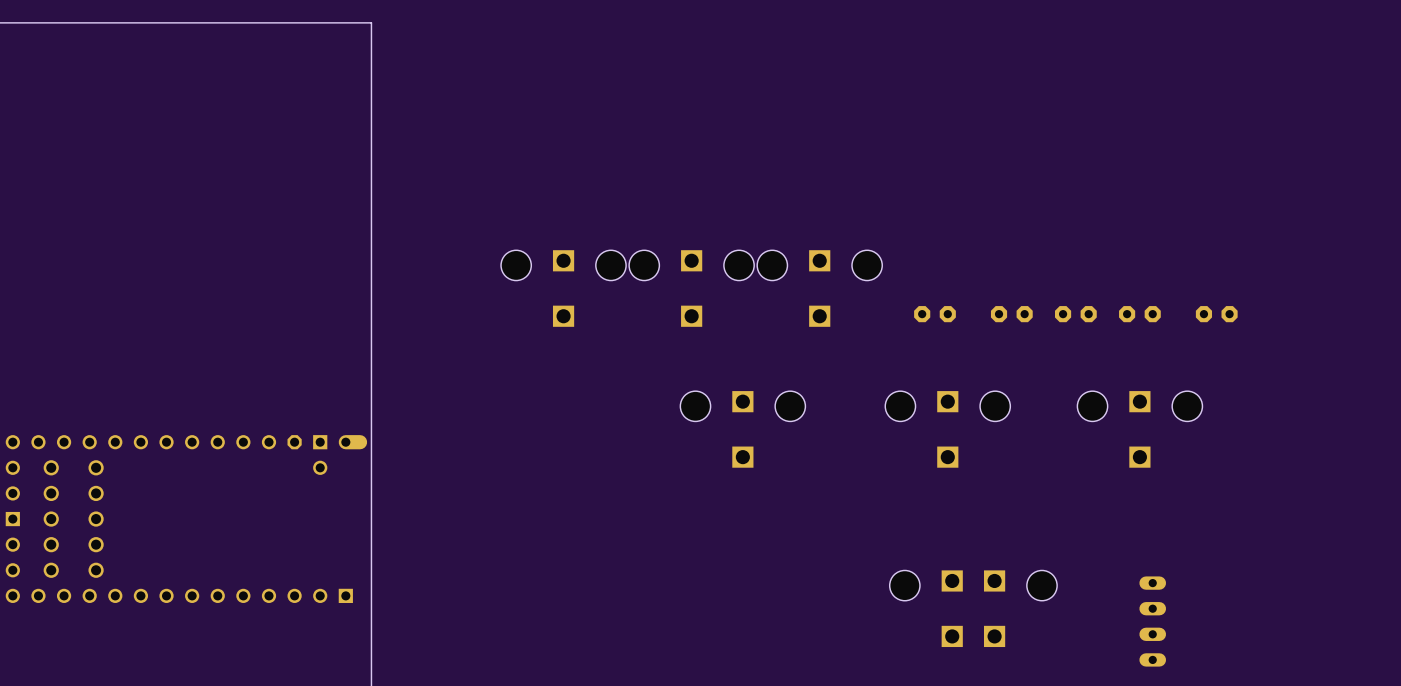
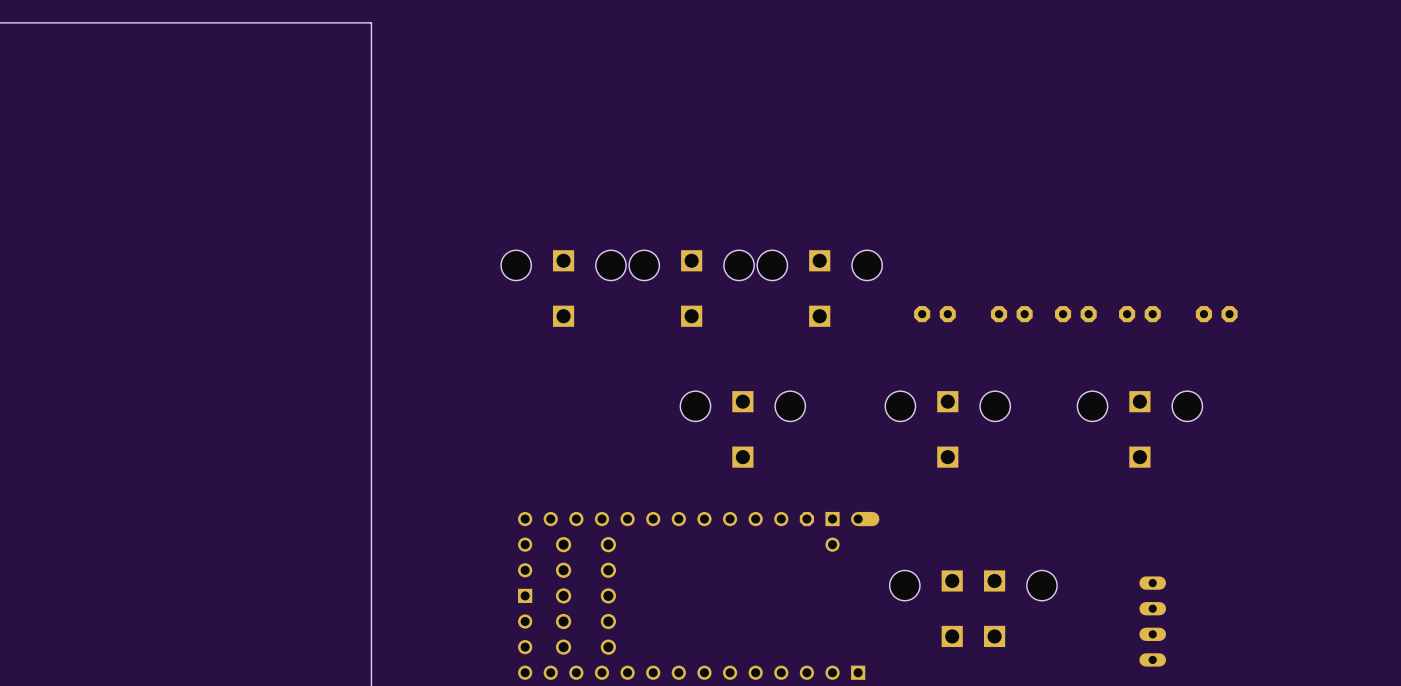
part: (186, 519) -> none
part: none -> (698, 595)

